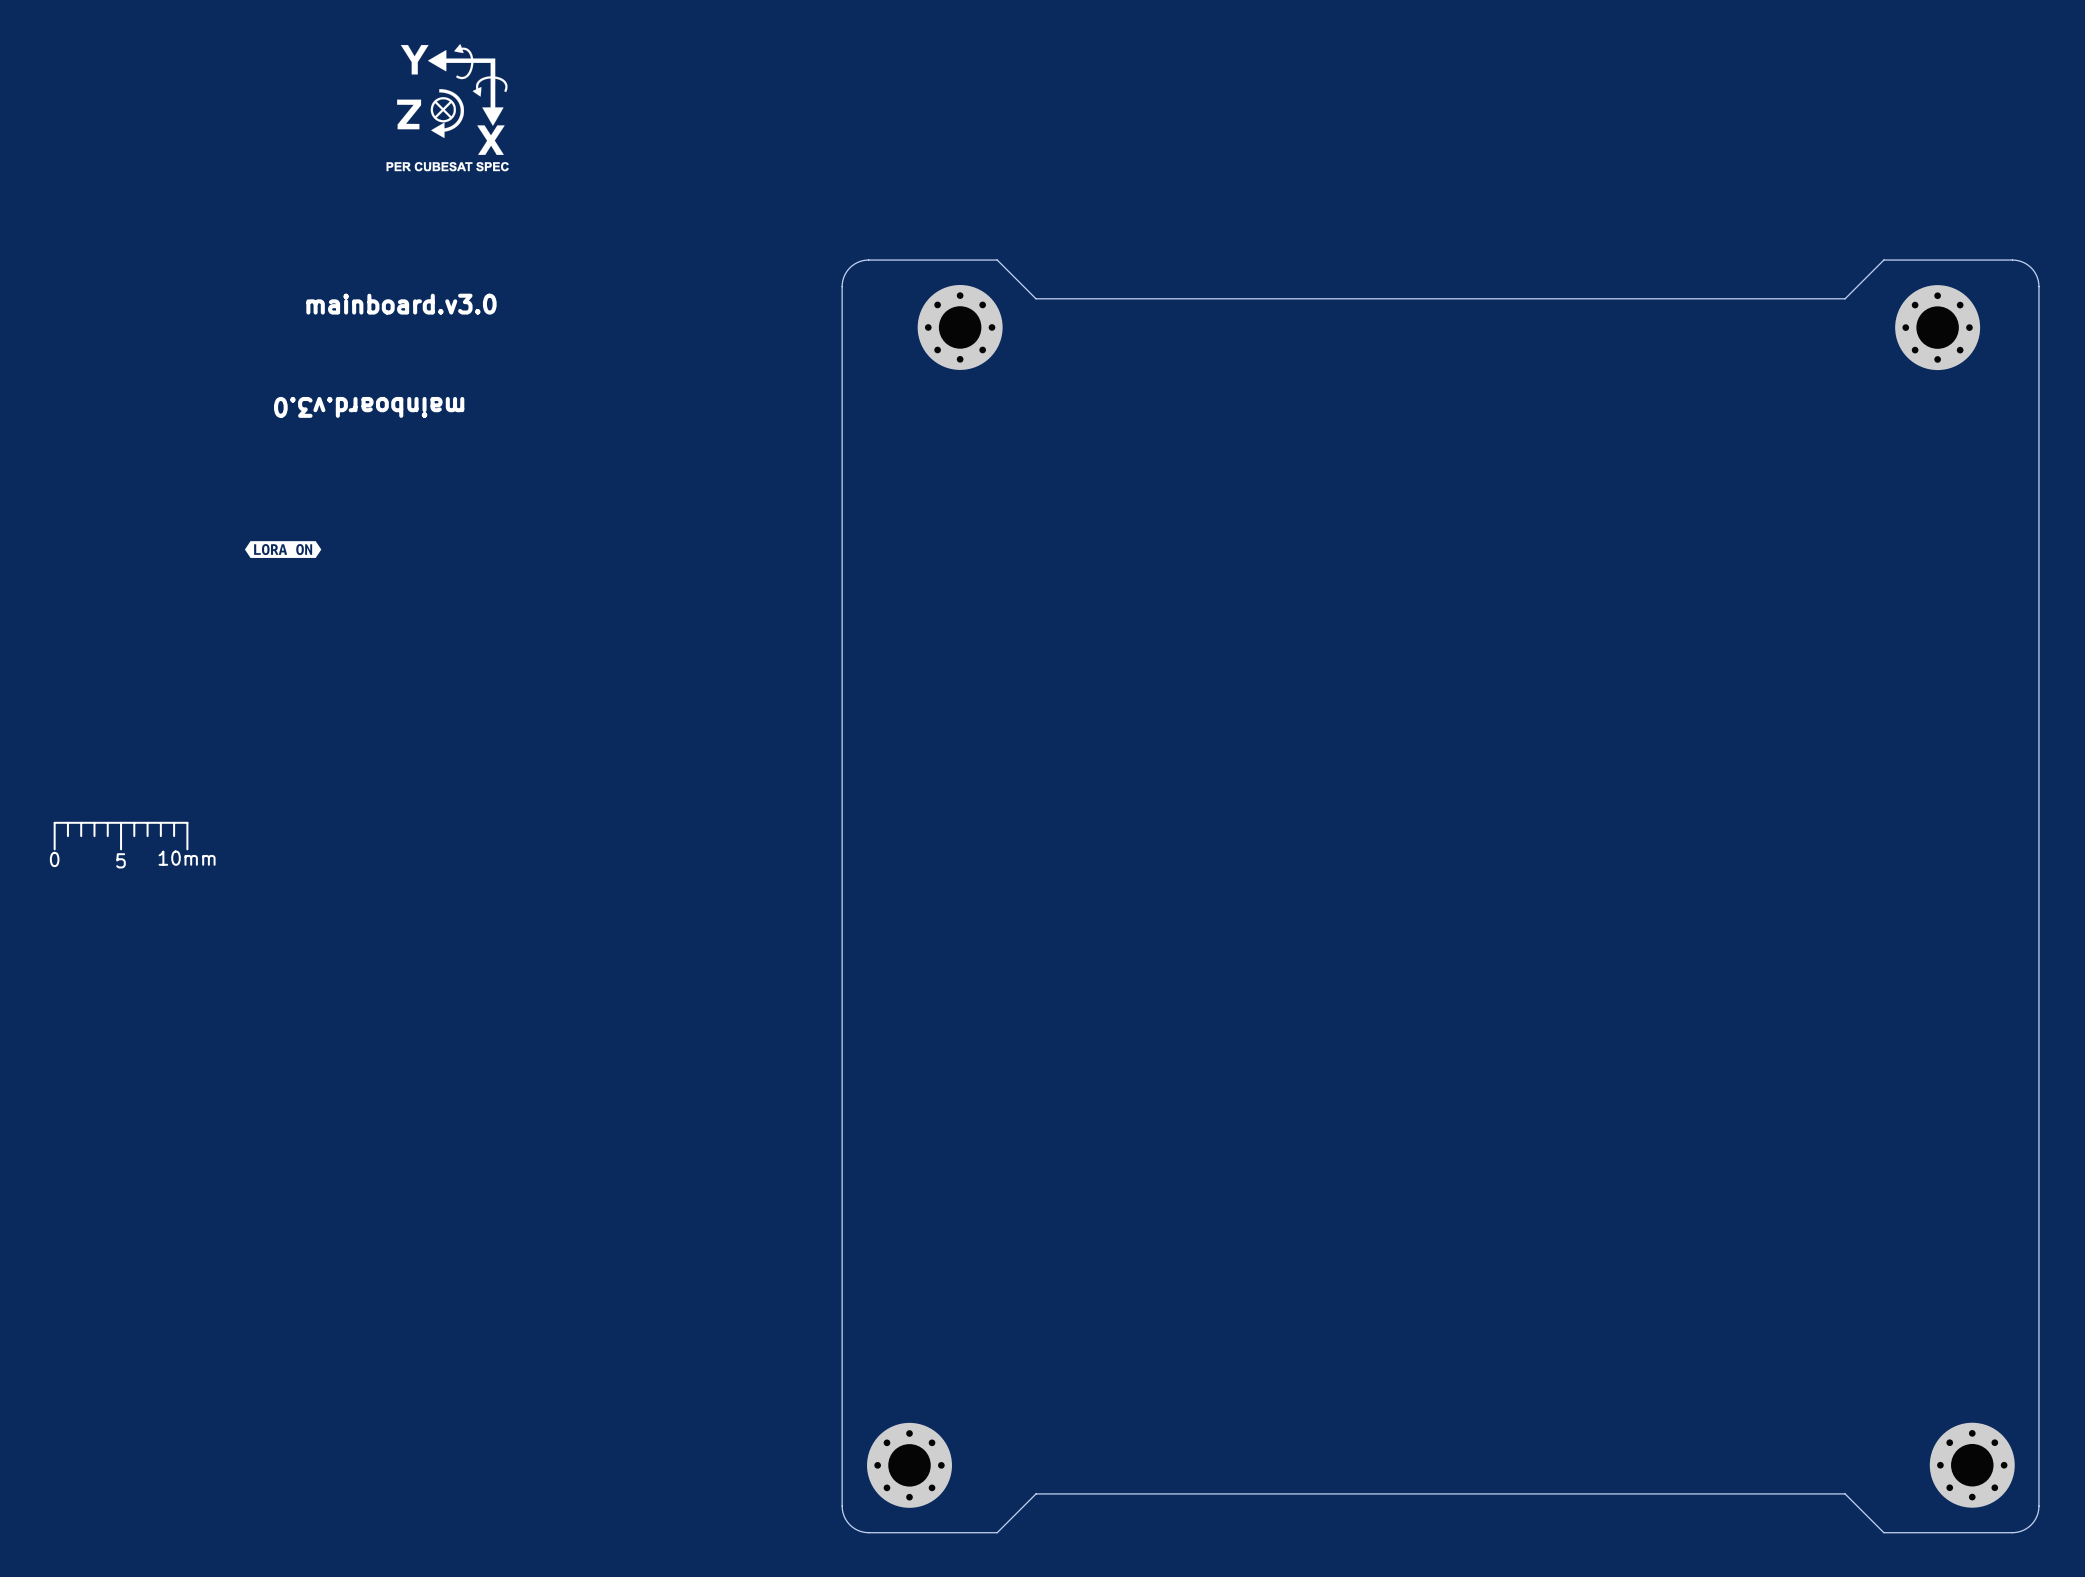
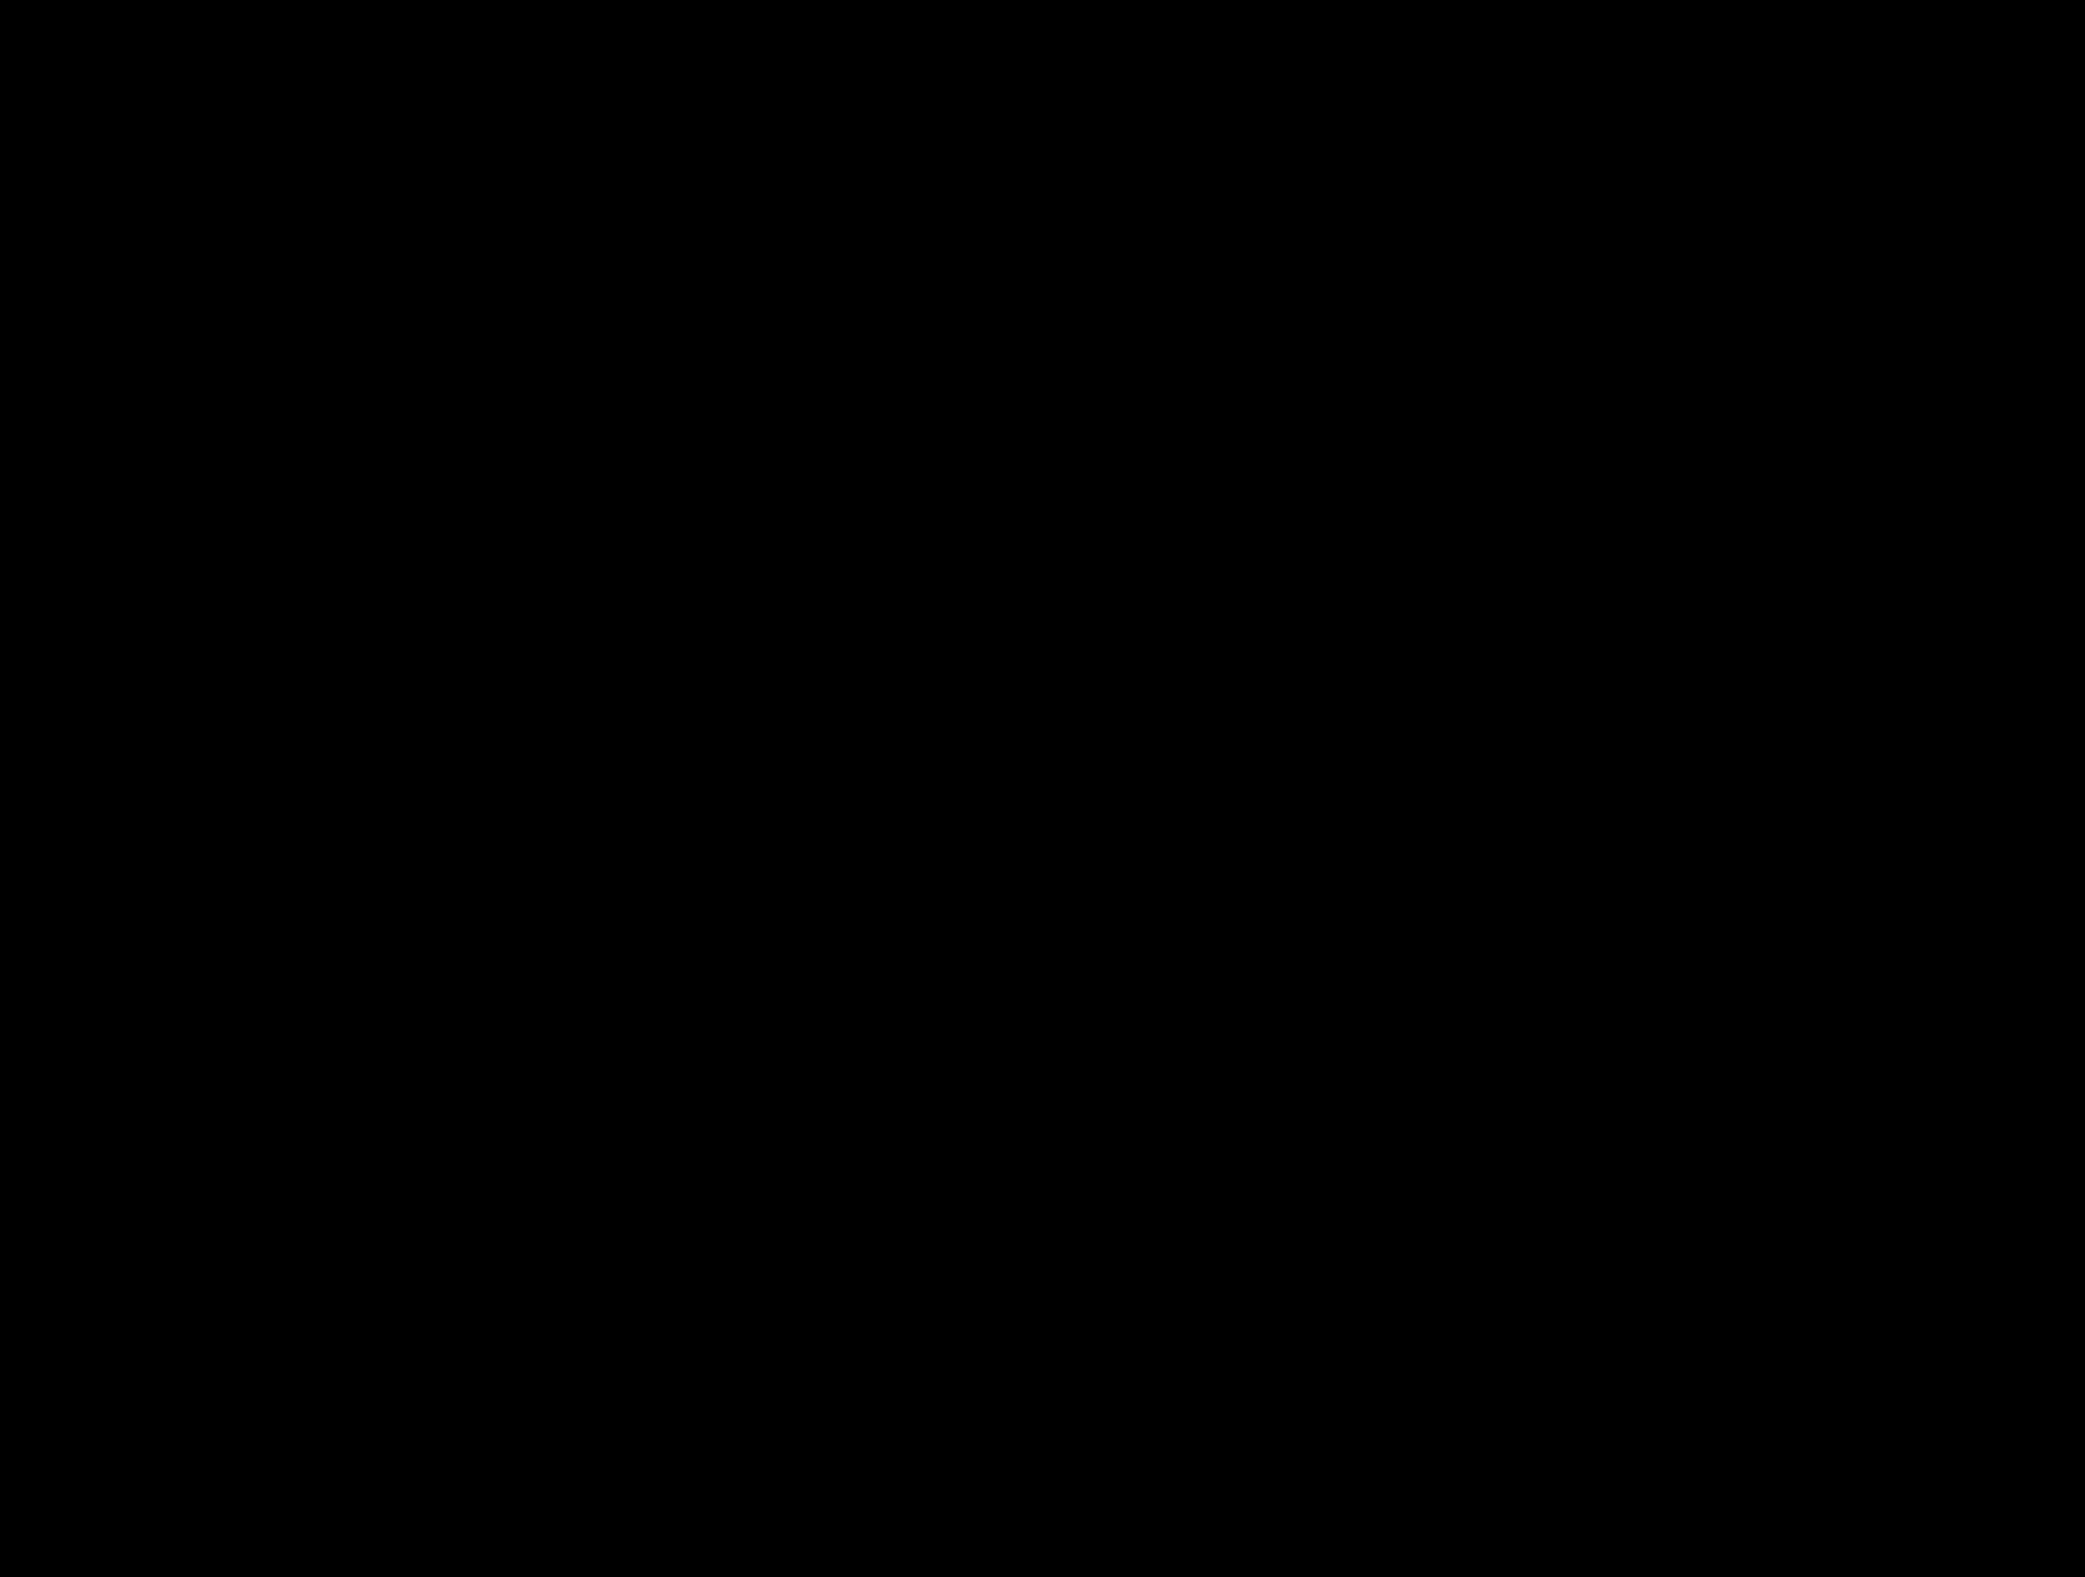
drawing: [386, 44, 509, 172] -> none
board edge: (868, 260) (997, 260) (1035, 298) (1845, 298) (1883, 260) (2012, 260) (2023, 262) (2031, 267) (2037, 277) (2038, 286) (2038, 1506) (2036, 1516) (2031, 1524) (2022, 1530) (2012, 1532) (1883, 1532) (1845, 1493) (1035, 1493) (997, 1532) (868, 1532) (858, 1530) (849, 1524) (844, 1516) (842, 1506) (842, 286) (844, 275) (849, 267) (859, 261) (868, 260) -> none
text: mainboard.v3.0 (401, 304) -> none
part: (960, 327) -> none
part: (1937, 327) -> none
text: mainboard.v3.0 (369, 407) -> none
drawing: [244, 541, 322, 558] -> none
drawing: [53, 821, 189, 851] -> none
part: (909, 1465) -> none
part: (1972, 1465) -> none

